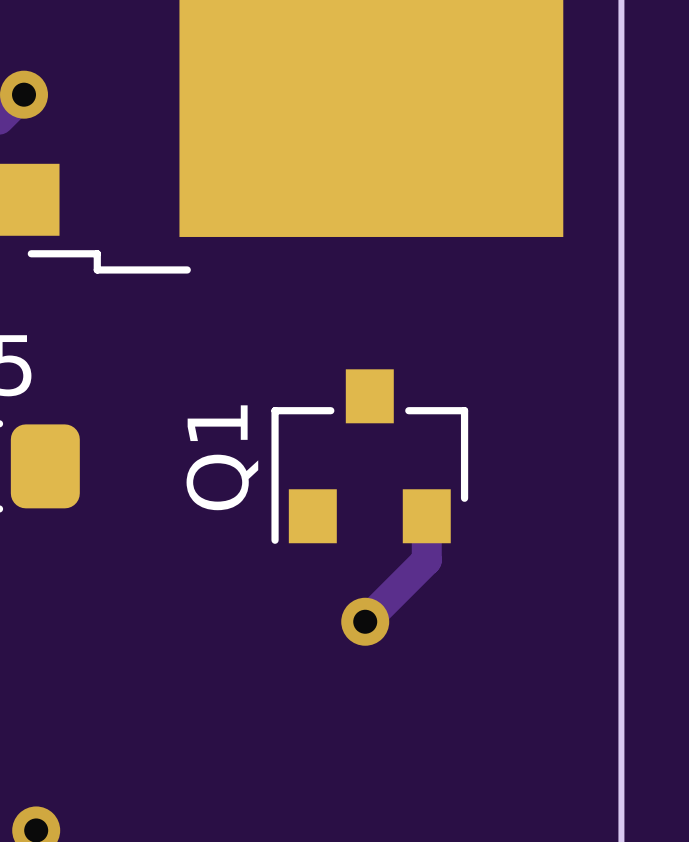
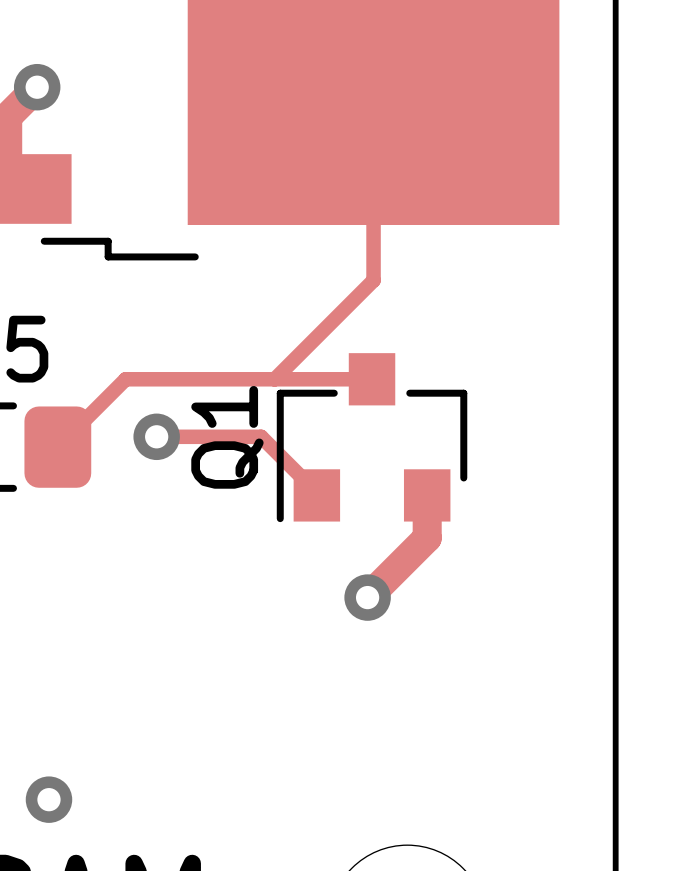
track: none -> (373, 56) (373, 280) (274, 379)
track: none -> (372, 379) (125, 379) (57, 447)
track: none -> (156, 436) (261, 436) (316, 492) (316, 495)
via: none -> (156, 436)

